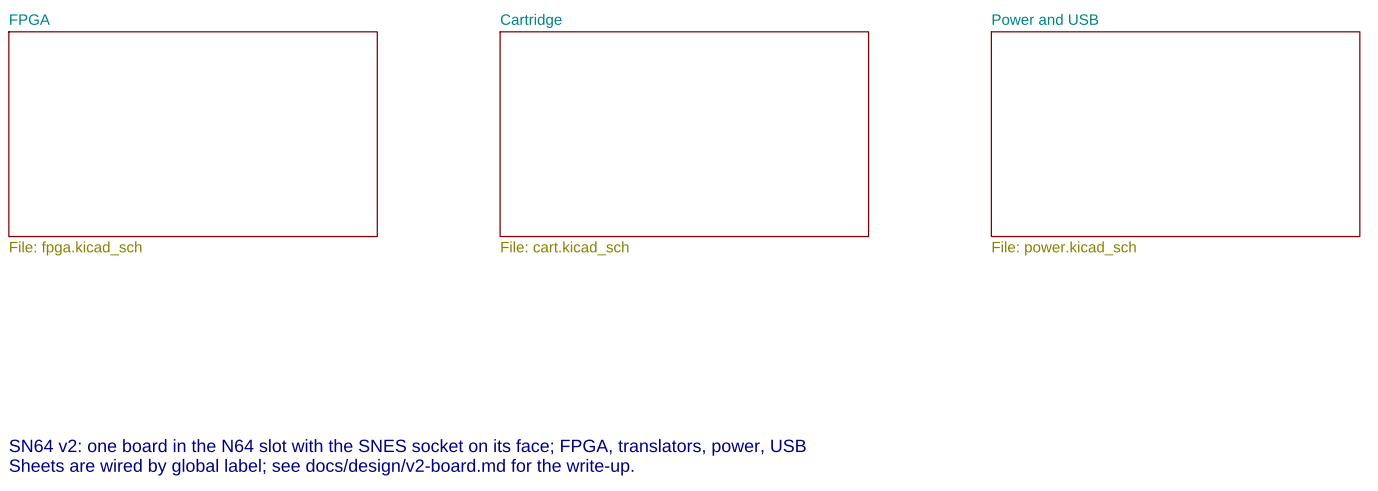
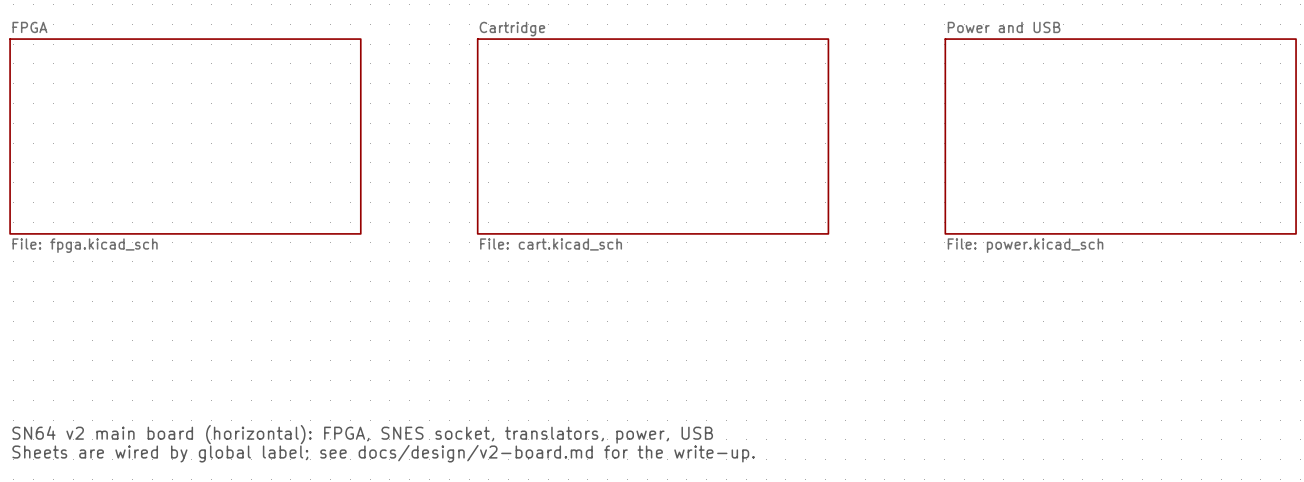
text: SN64 v2: one board in the N64 slot with the SNES socket on its face; FPGA, translators, power, USB (407, 447) -> SN64 v2 main board (horizontal): FPGA, SNES socket, translators, power, USB (362, 434)

